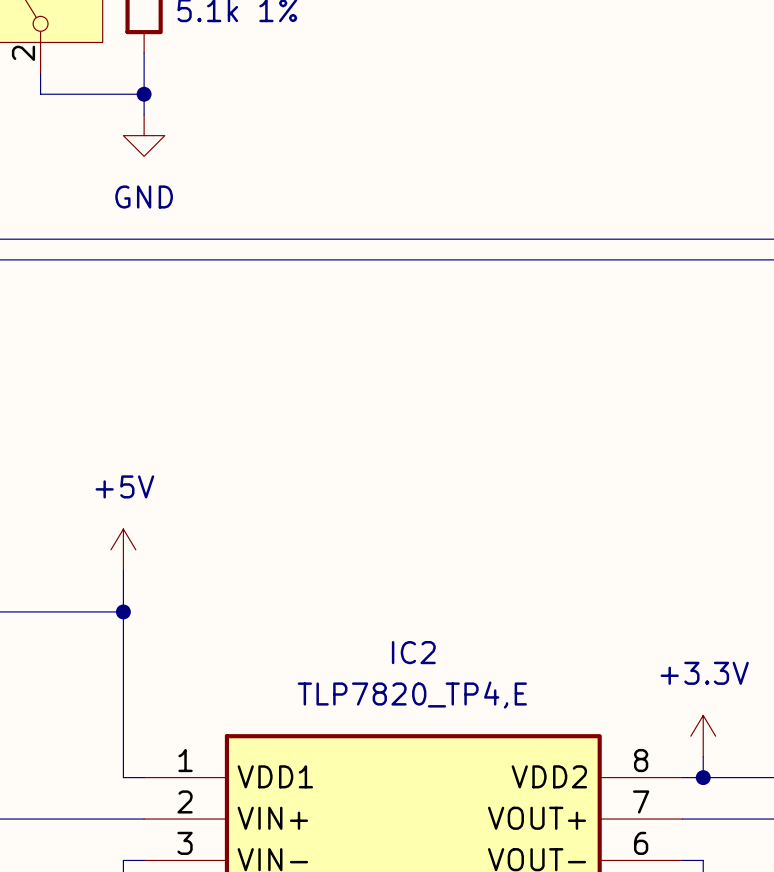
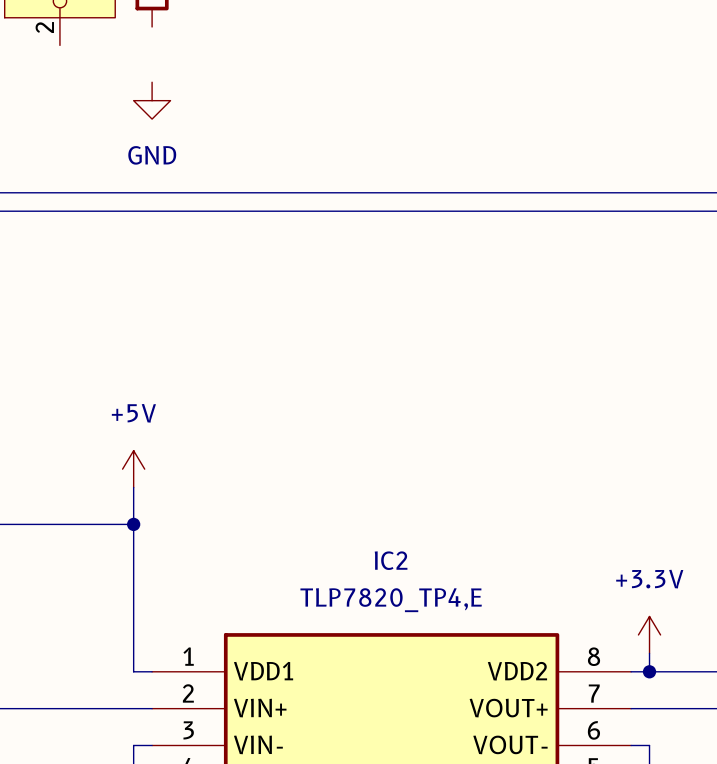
wire: (144, 52) (144, 114) -> none
wire: (40, 73) (40, 94) (144, 94) -> none
junction: (144, 94) -> none

